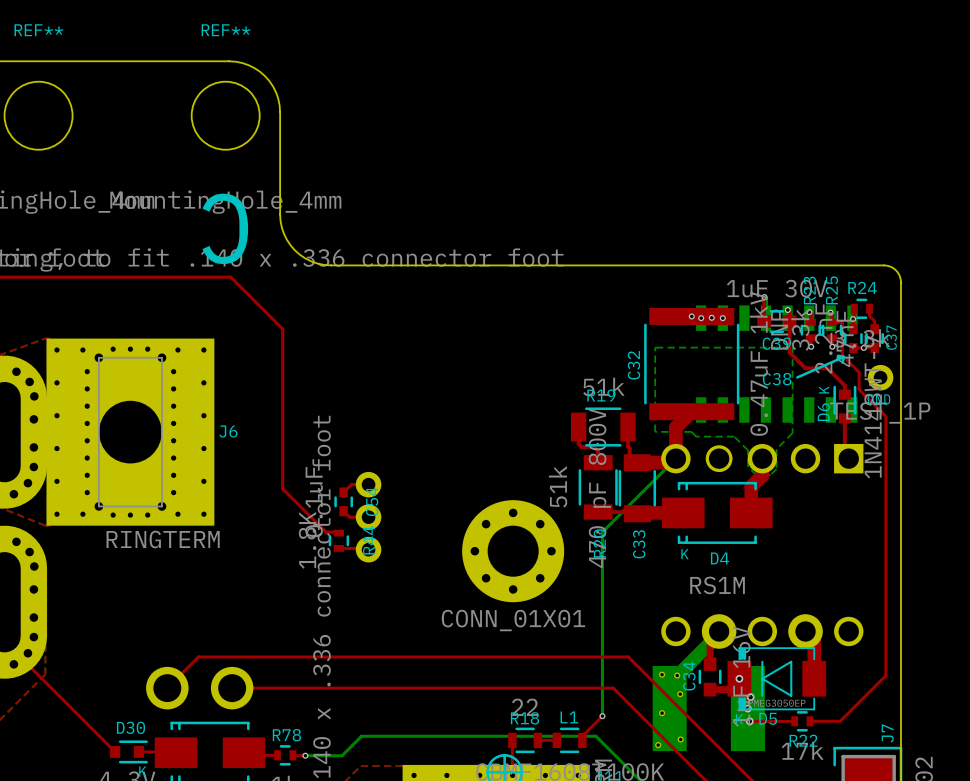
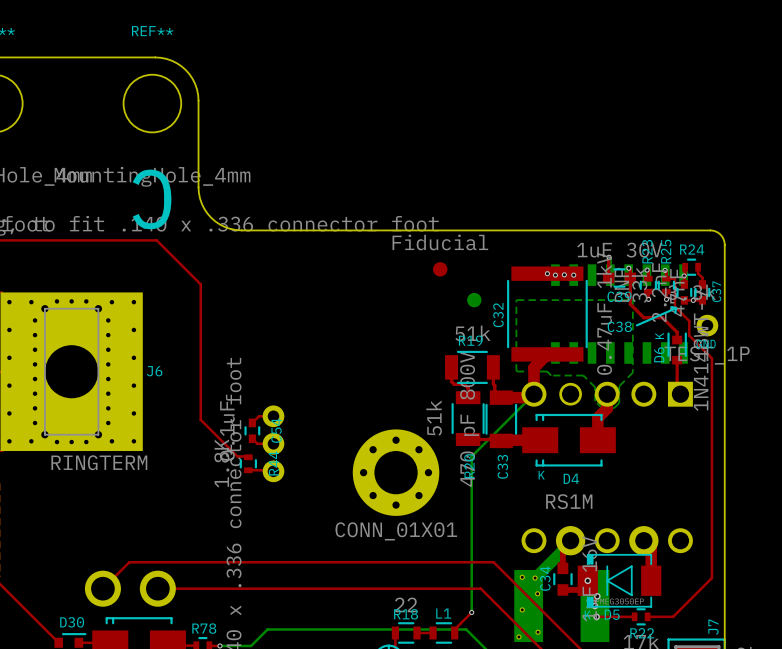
part: none -> Fiducial (440, 269)
part: none -> (474, 300)

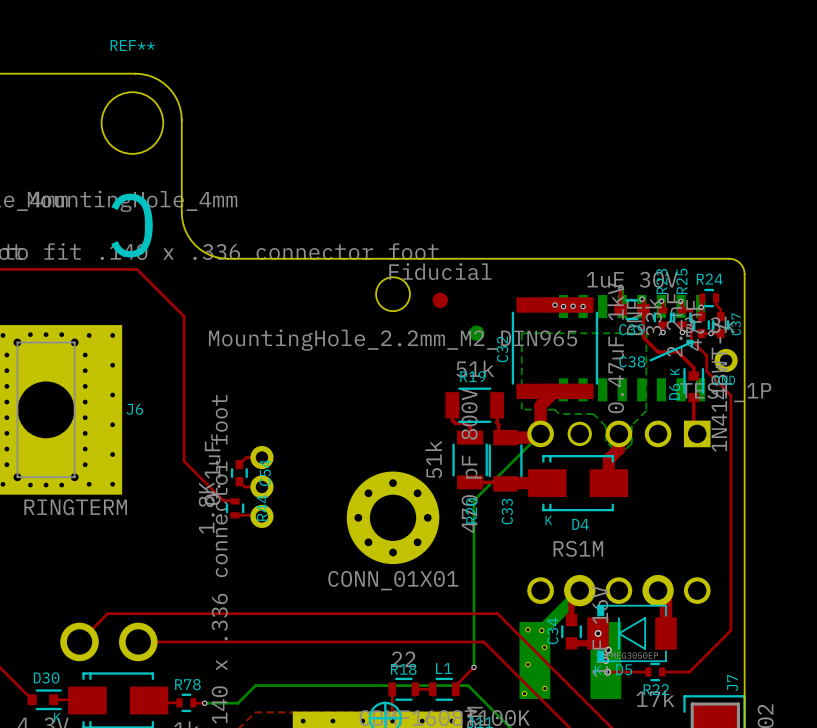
part: none -> MountingHole_2.2mm_M2_DIN965 (393, 294)

